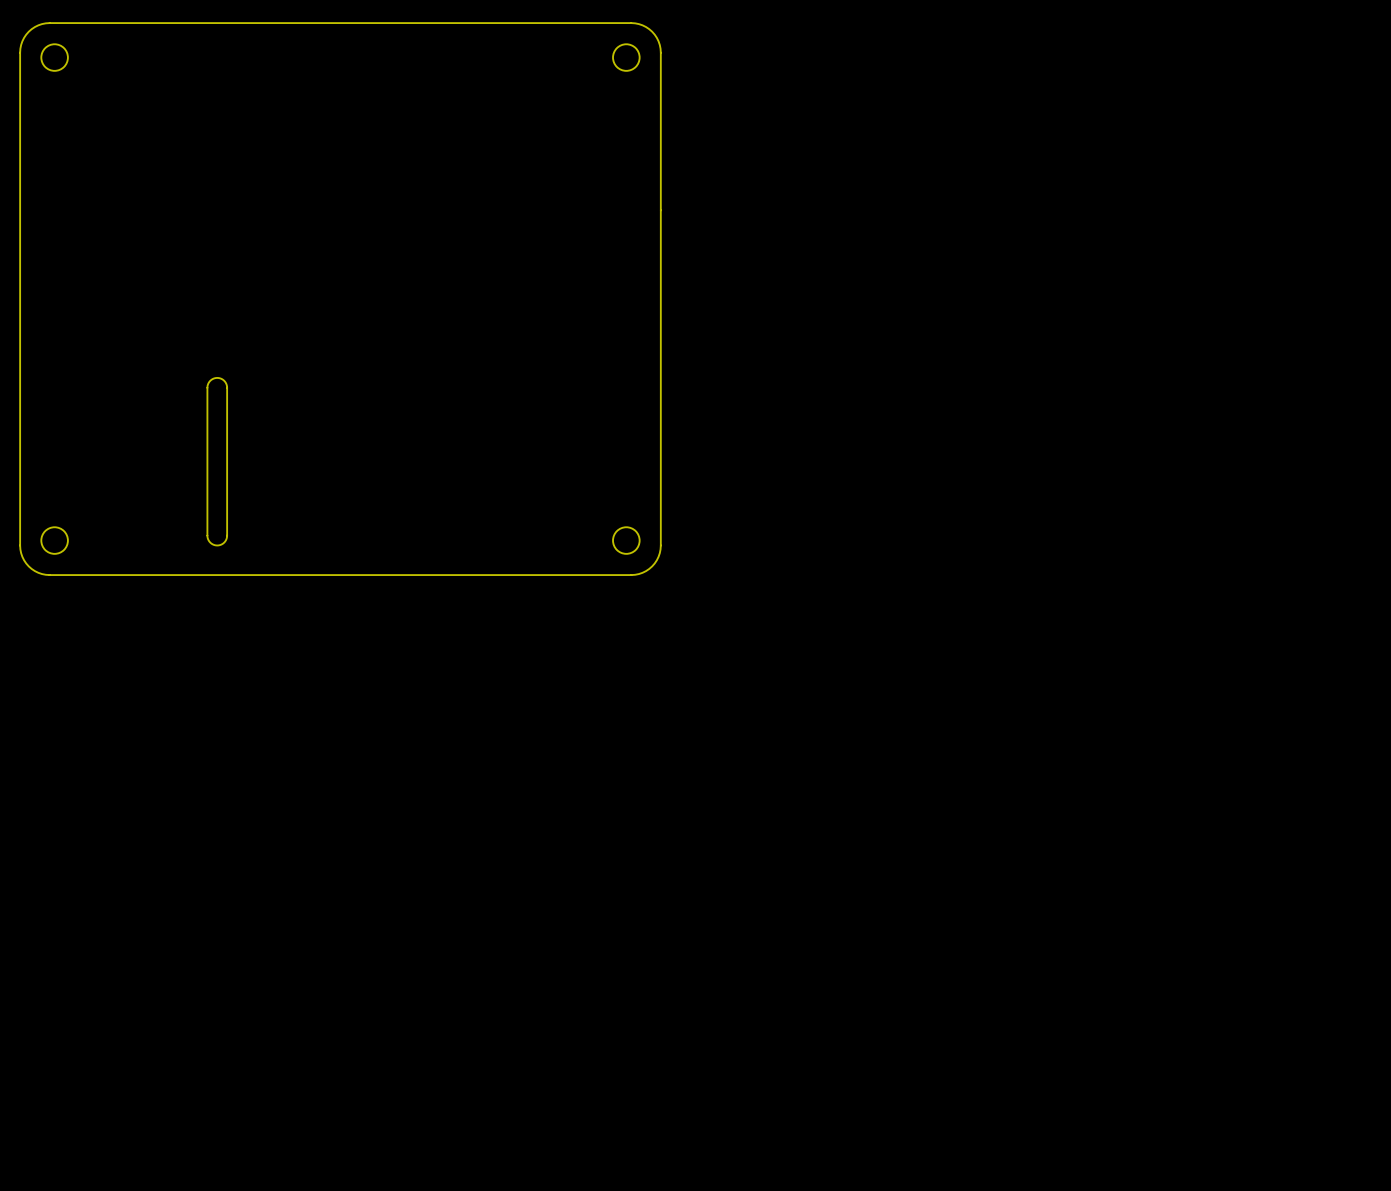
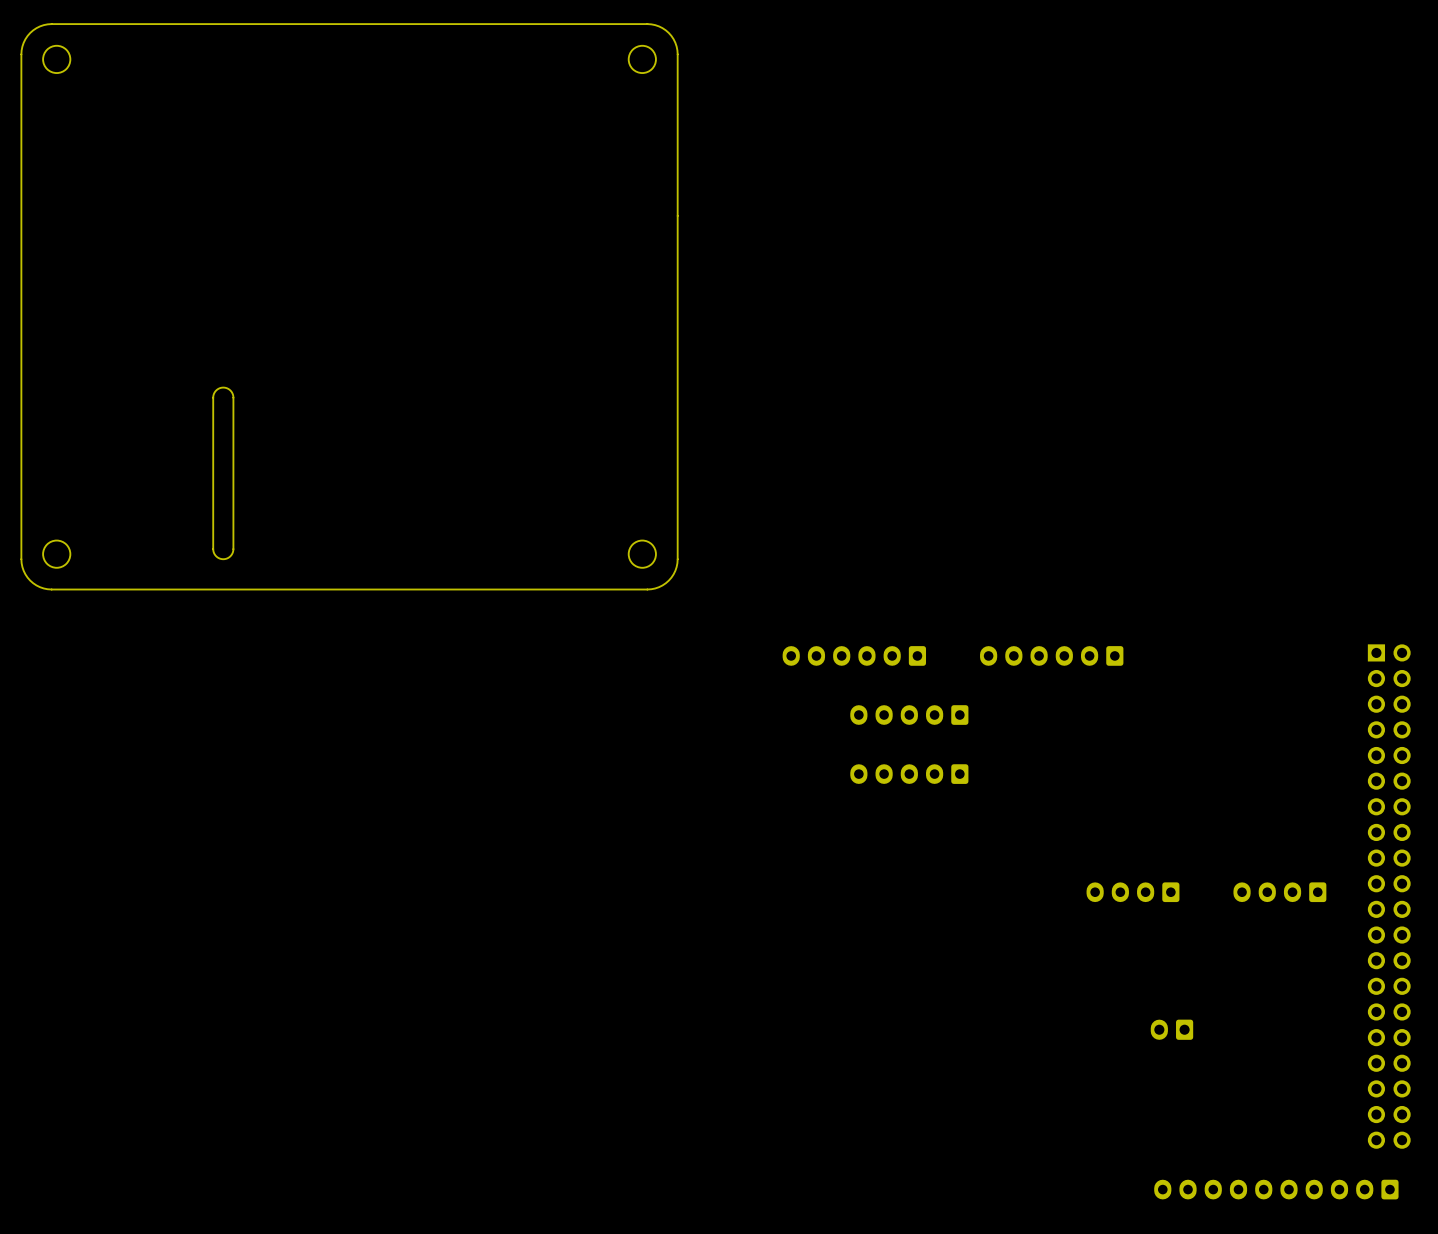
part: none -> (854, 655)
part: none -> (1051, 655)
part: none -> (909, 715)
part: none -> (909, 774)
part: none -> (1133, 892)
part: none -> (1279, 892)
part: none -> (1389, 896)
part: none -> (1171, 1029)
part: none -> (1276, 1189)

